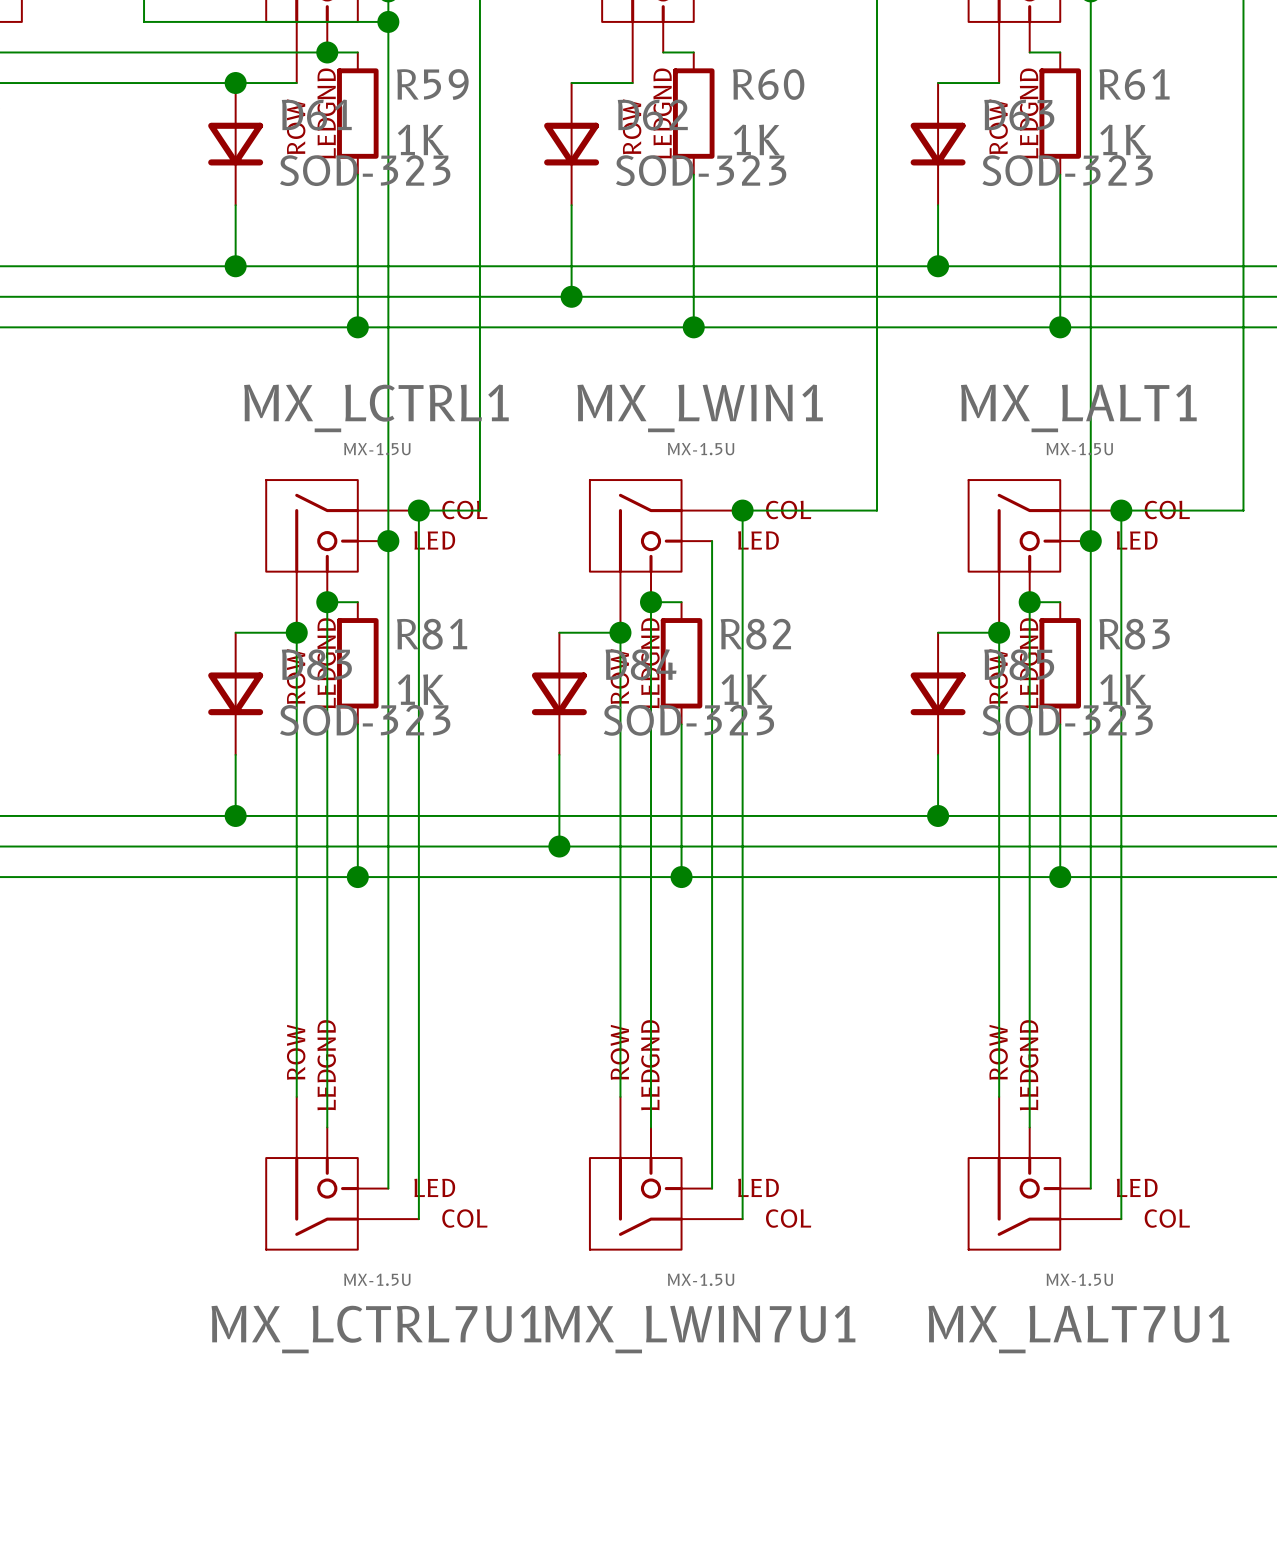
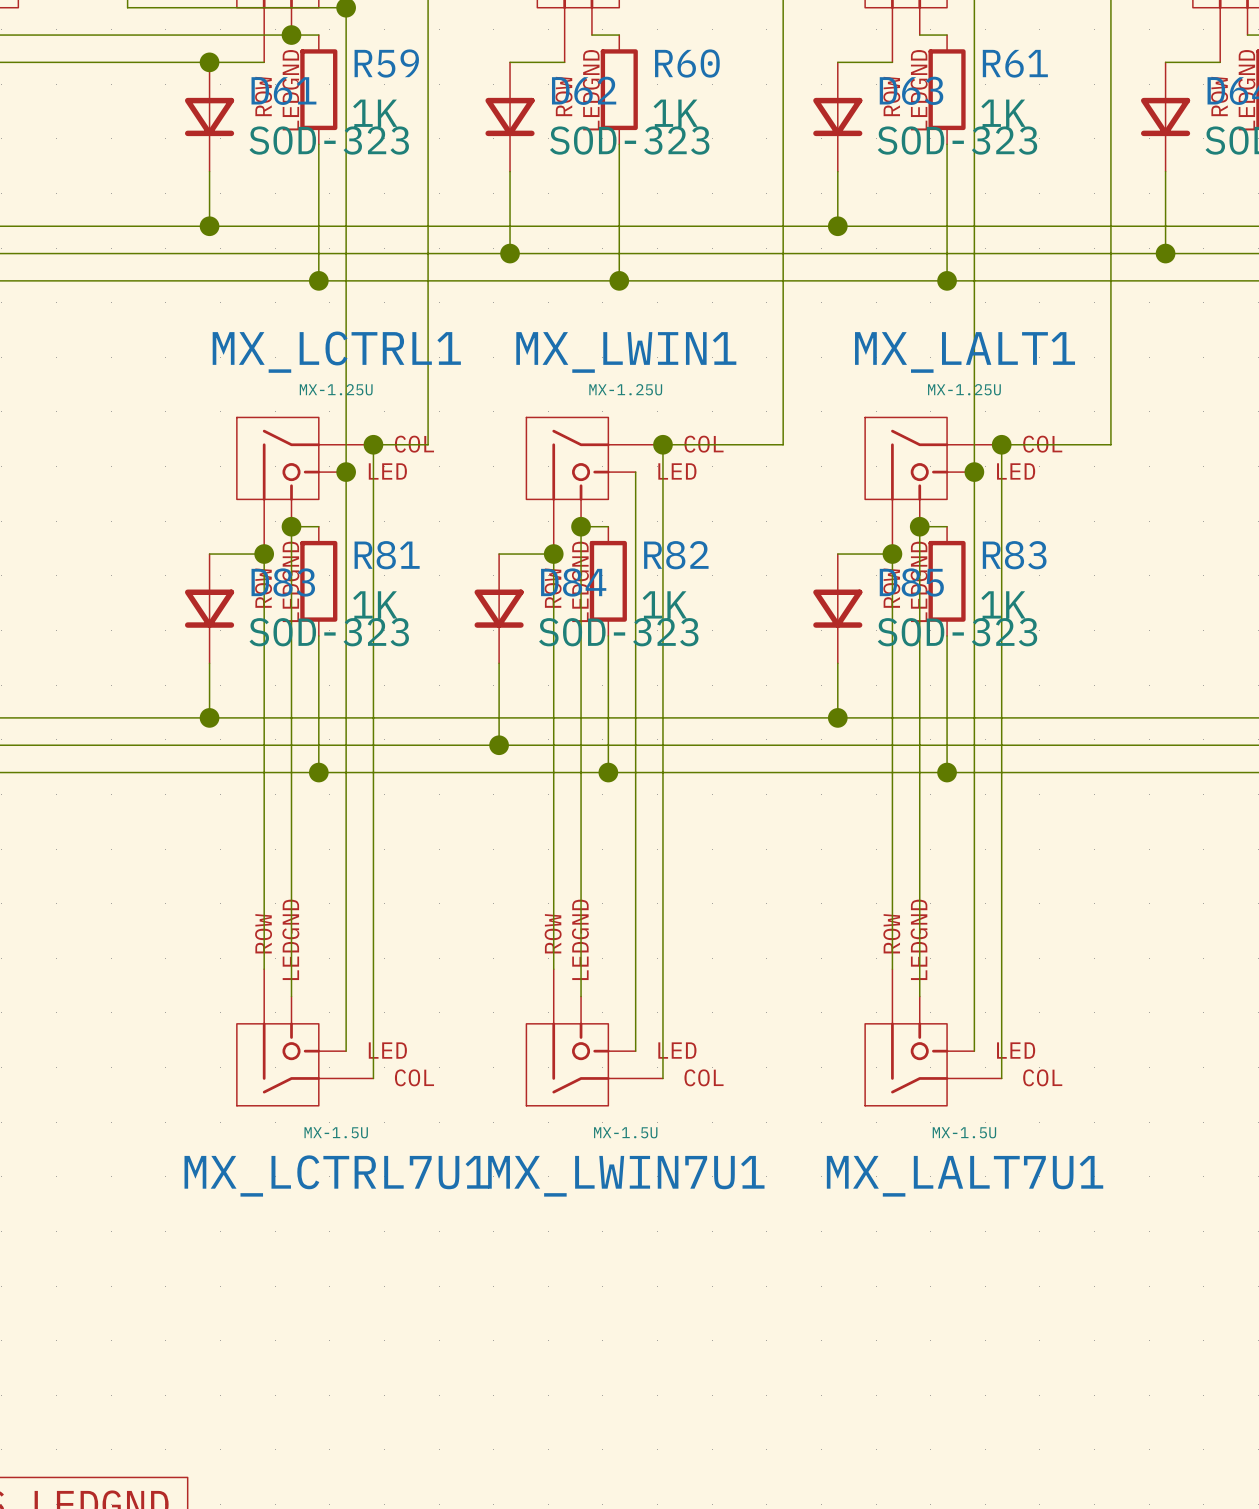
MX_LCTRL1 value: MX-1.5U (377, 449) -> MX-1.25U (336, 389)
MX_LWIN1 value: MX-1.5U (701, 449) -> MX-1.25U (625, 389)
MX_LALT1 value: MX-1.5U (1079, 449) -> MX-1.25U (964, 389)

